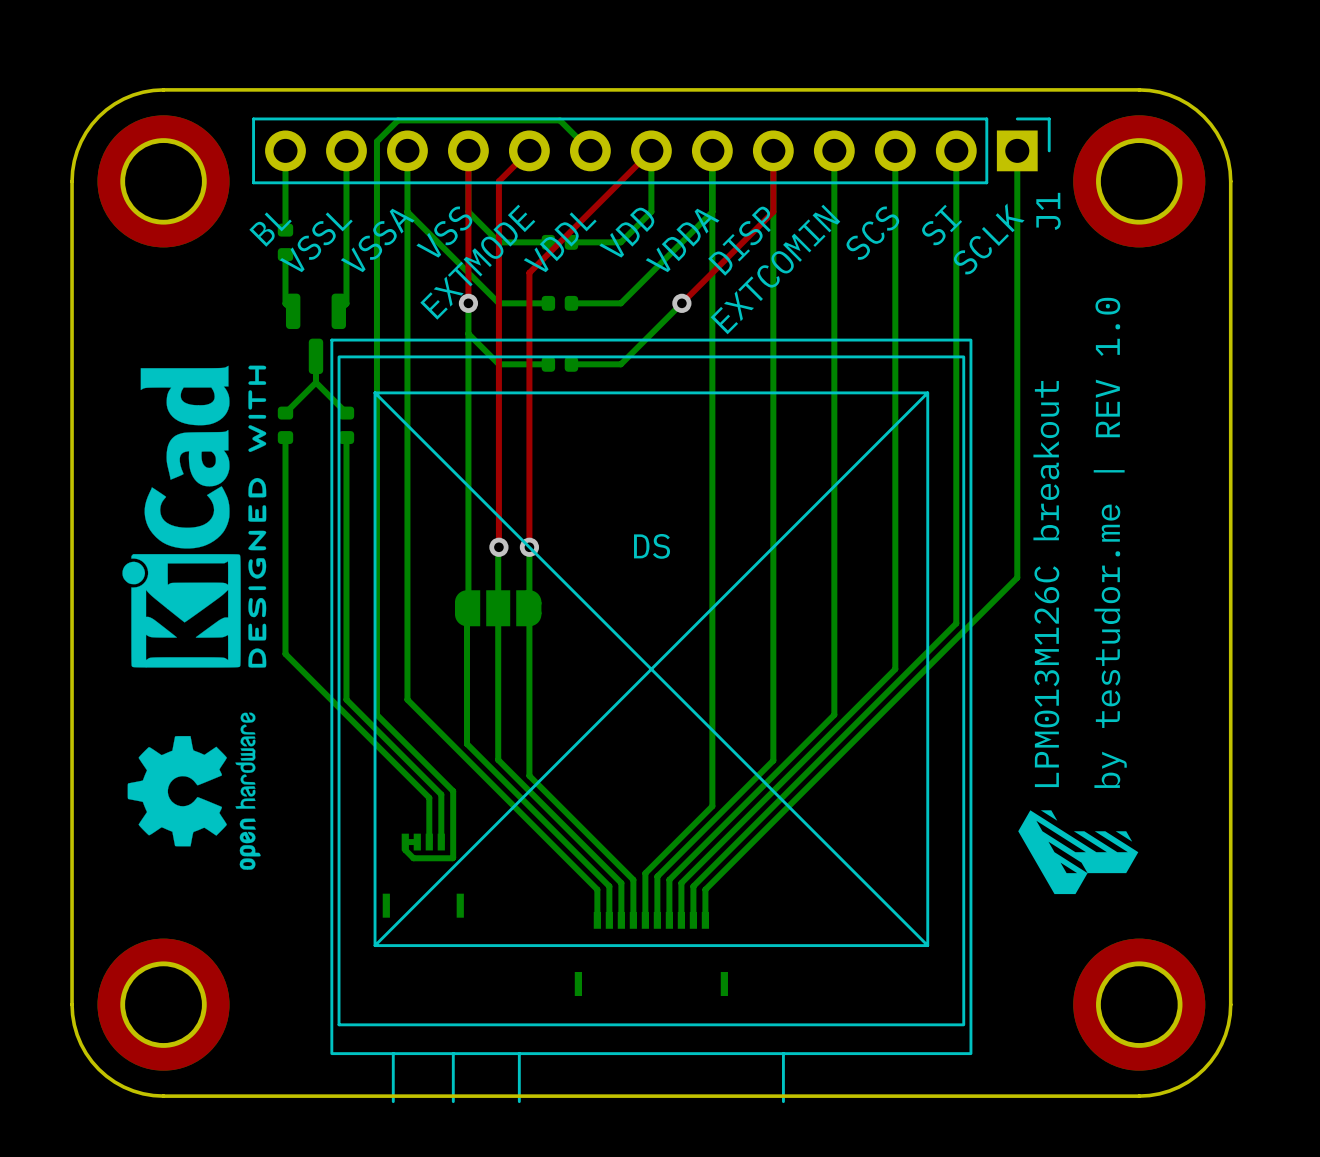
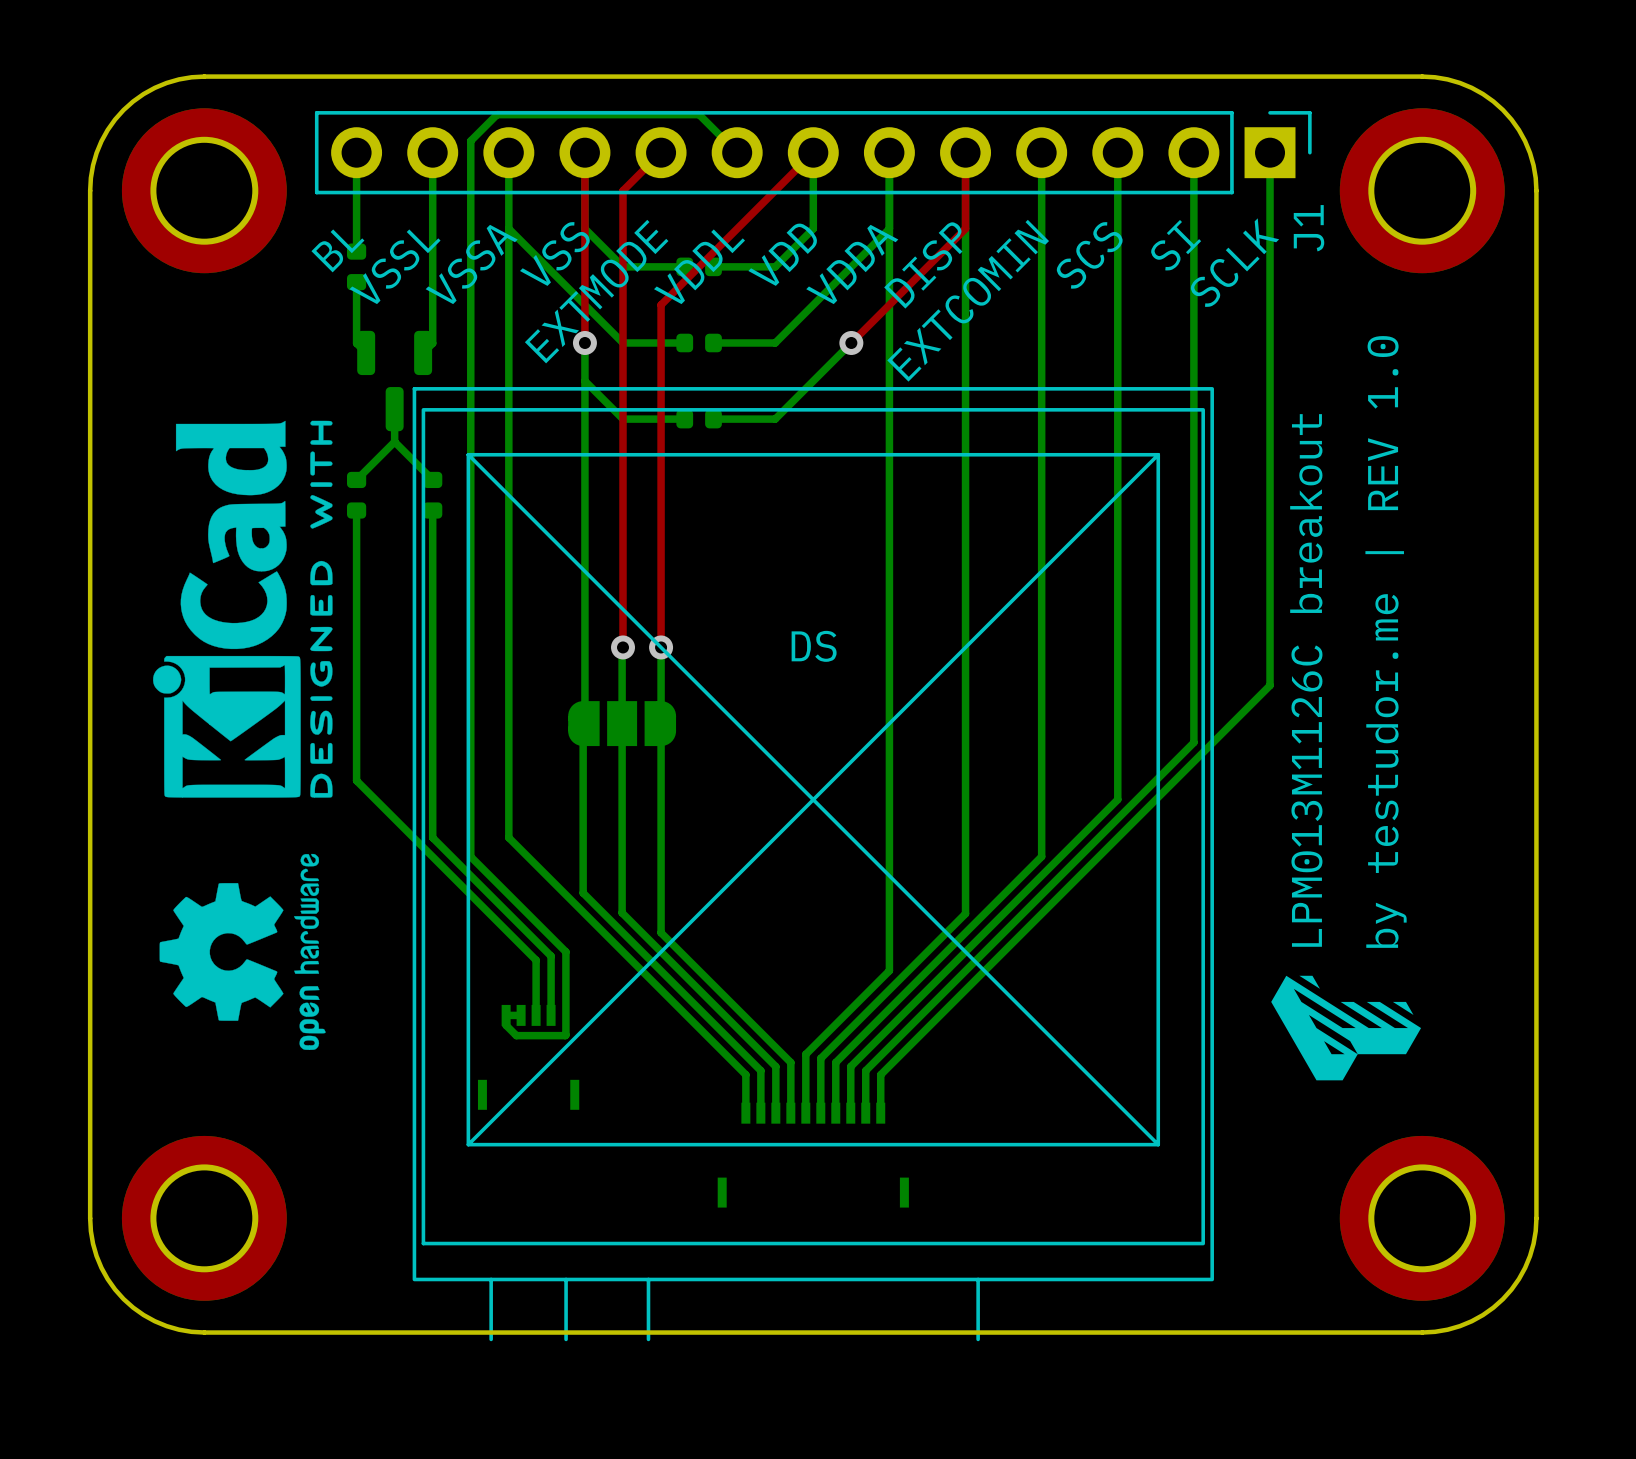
text: LPM013M126C breakout (1046, 584) -> LPM013M1126C breakout (1306, 680)

